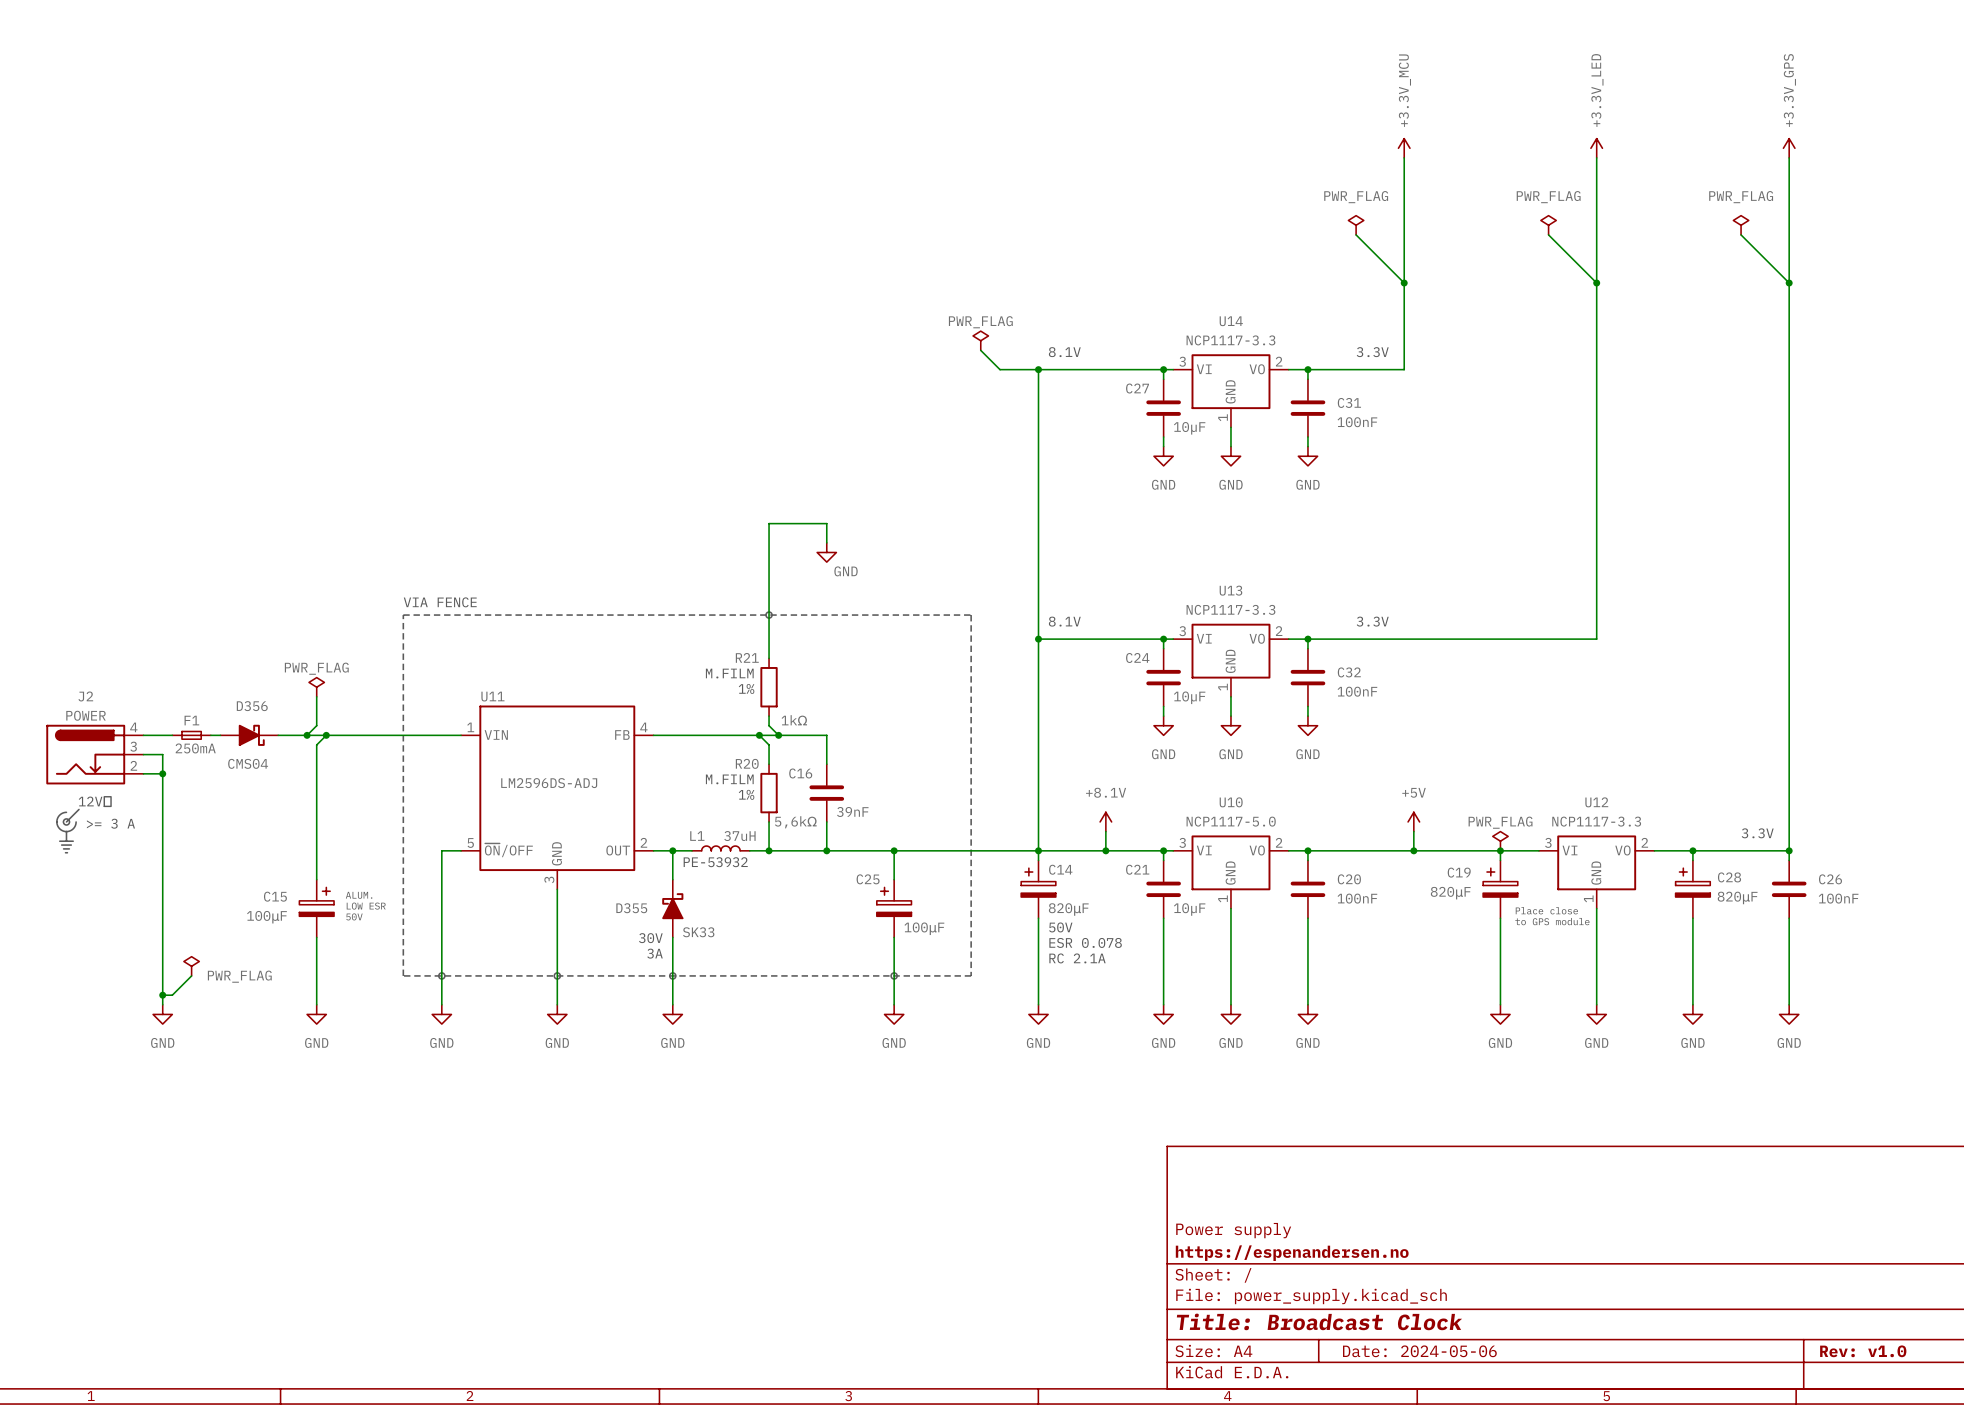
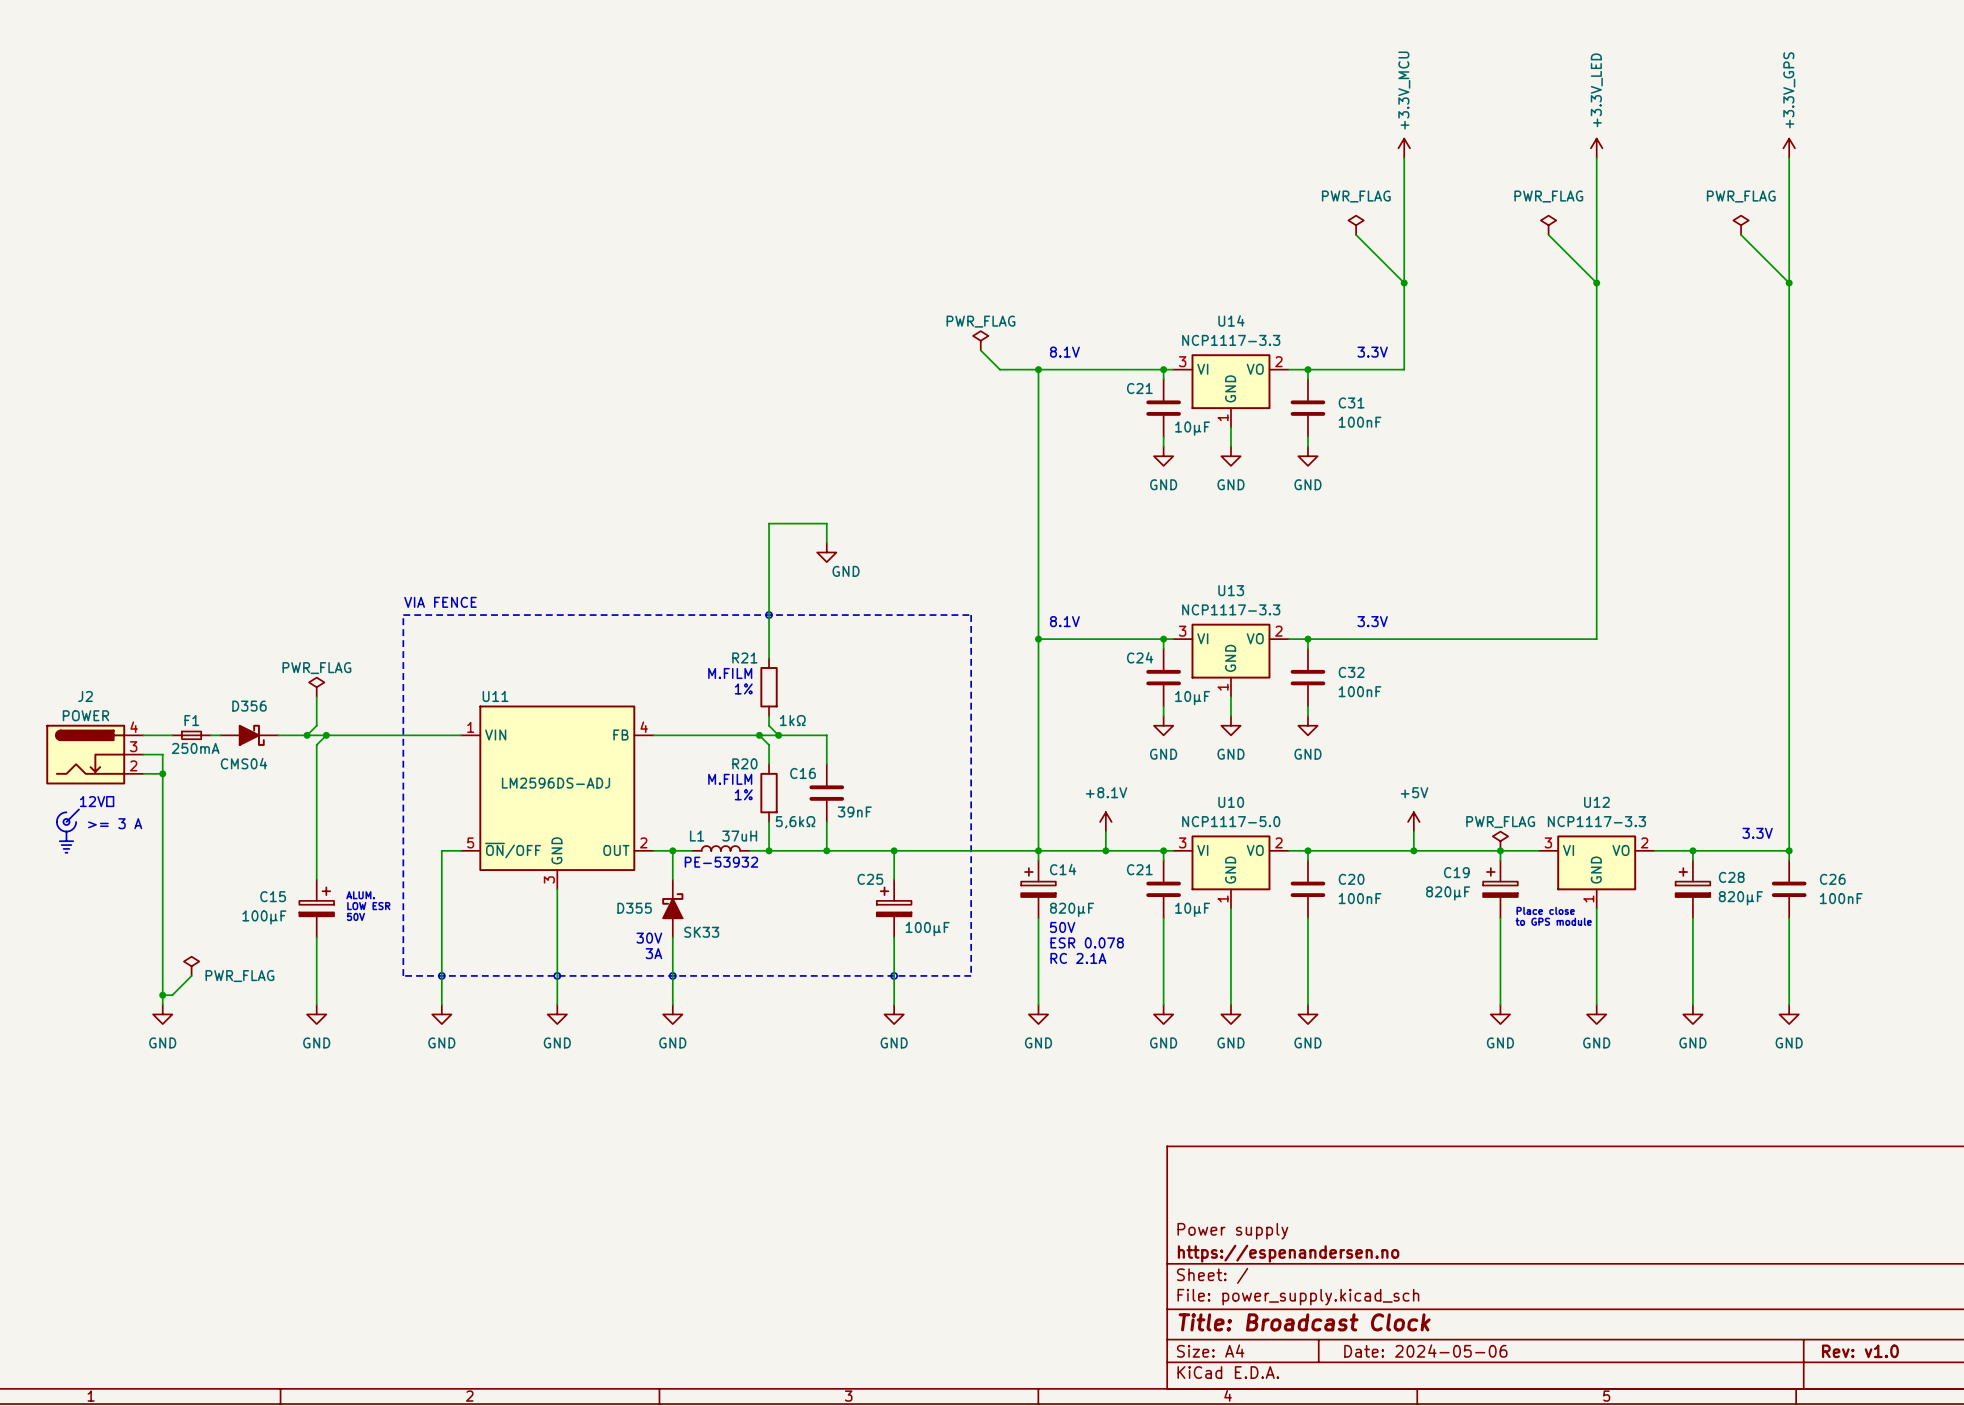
C27 name: C27 (1137, 388) -> C21 (1139, 388)

